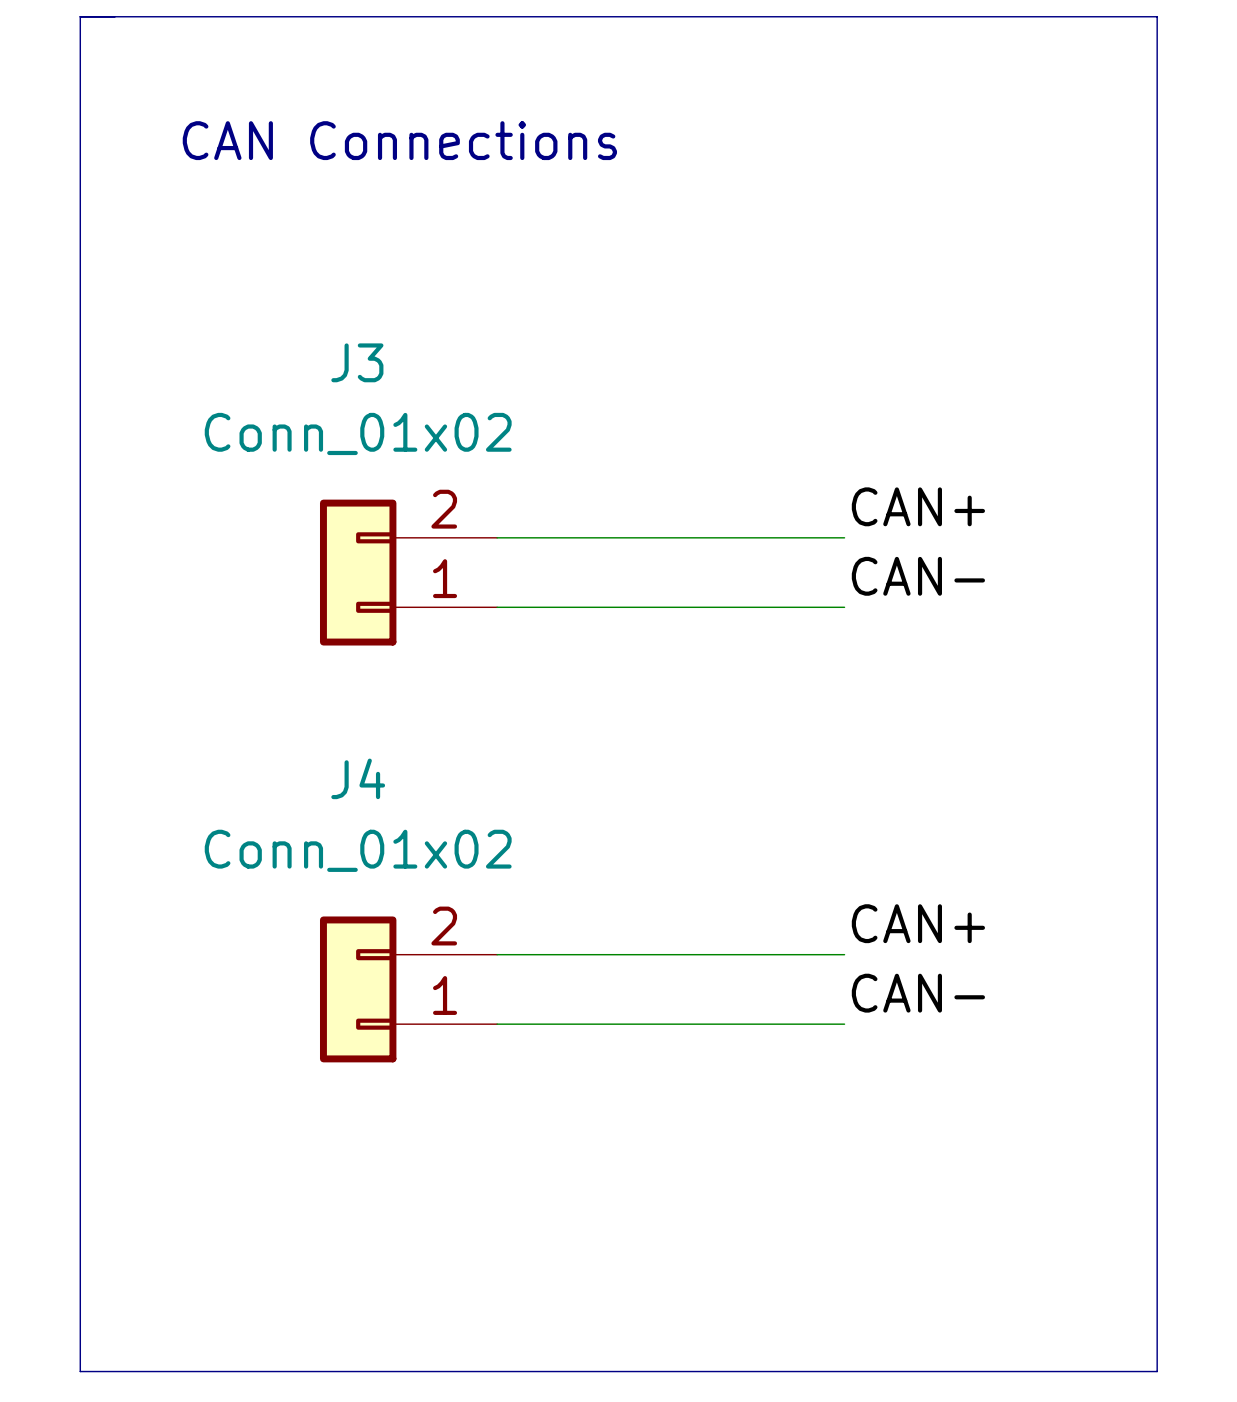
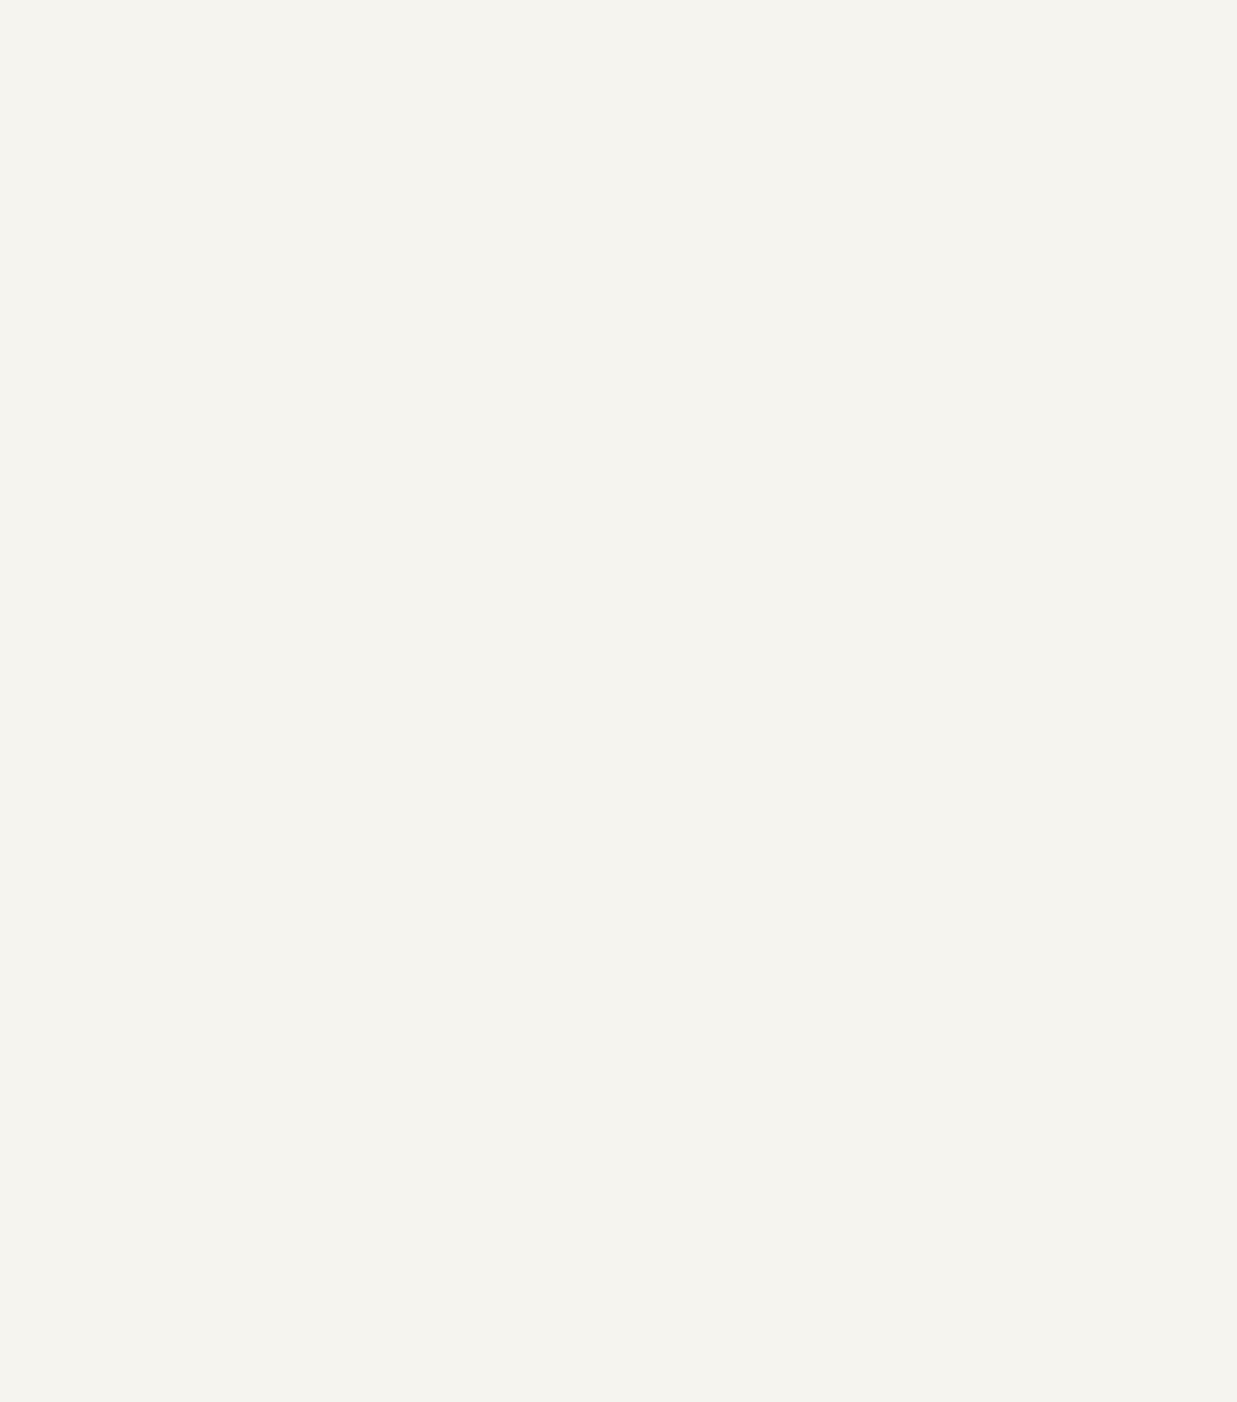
line: (80, 16) (1157, 16) (1157, 1371) (80, 1371) (80, 16) -> none
text: CAN Connections (399, 140) -> none
label: CAN+ (918, 506) -> none
wire: (497, 537) (844, 537) -> none
J3: Conn_01x02 (408, 572) -> none
label: CAN- (918, 576) -> none
wire: (497, 607) (844, 607) -> none
label: CAN+ (918, 923) -> none
wire: (497, 954) (844, 954) -> none
J4: Conn_01x02 (408, 989) -> none
label: CAN- (918, 993) -> none
wire: (497, 1024) (844, 1024) -> none

